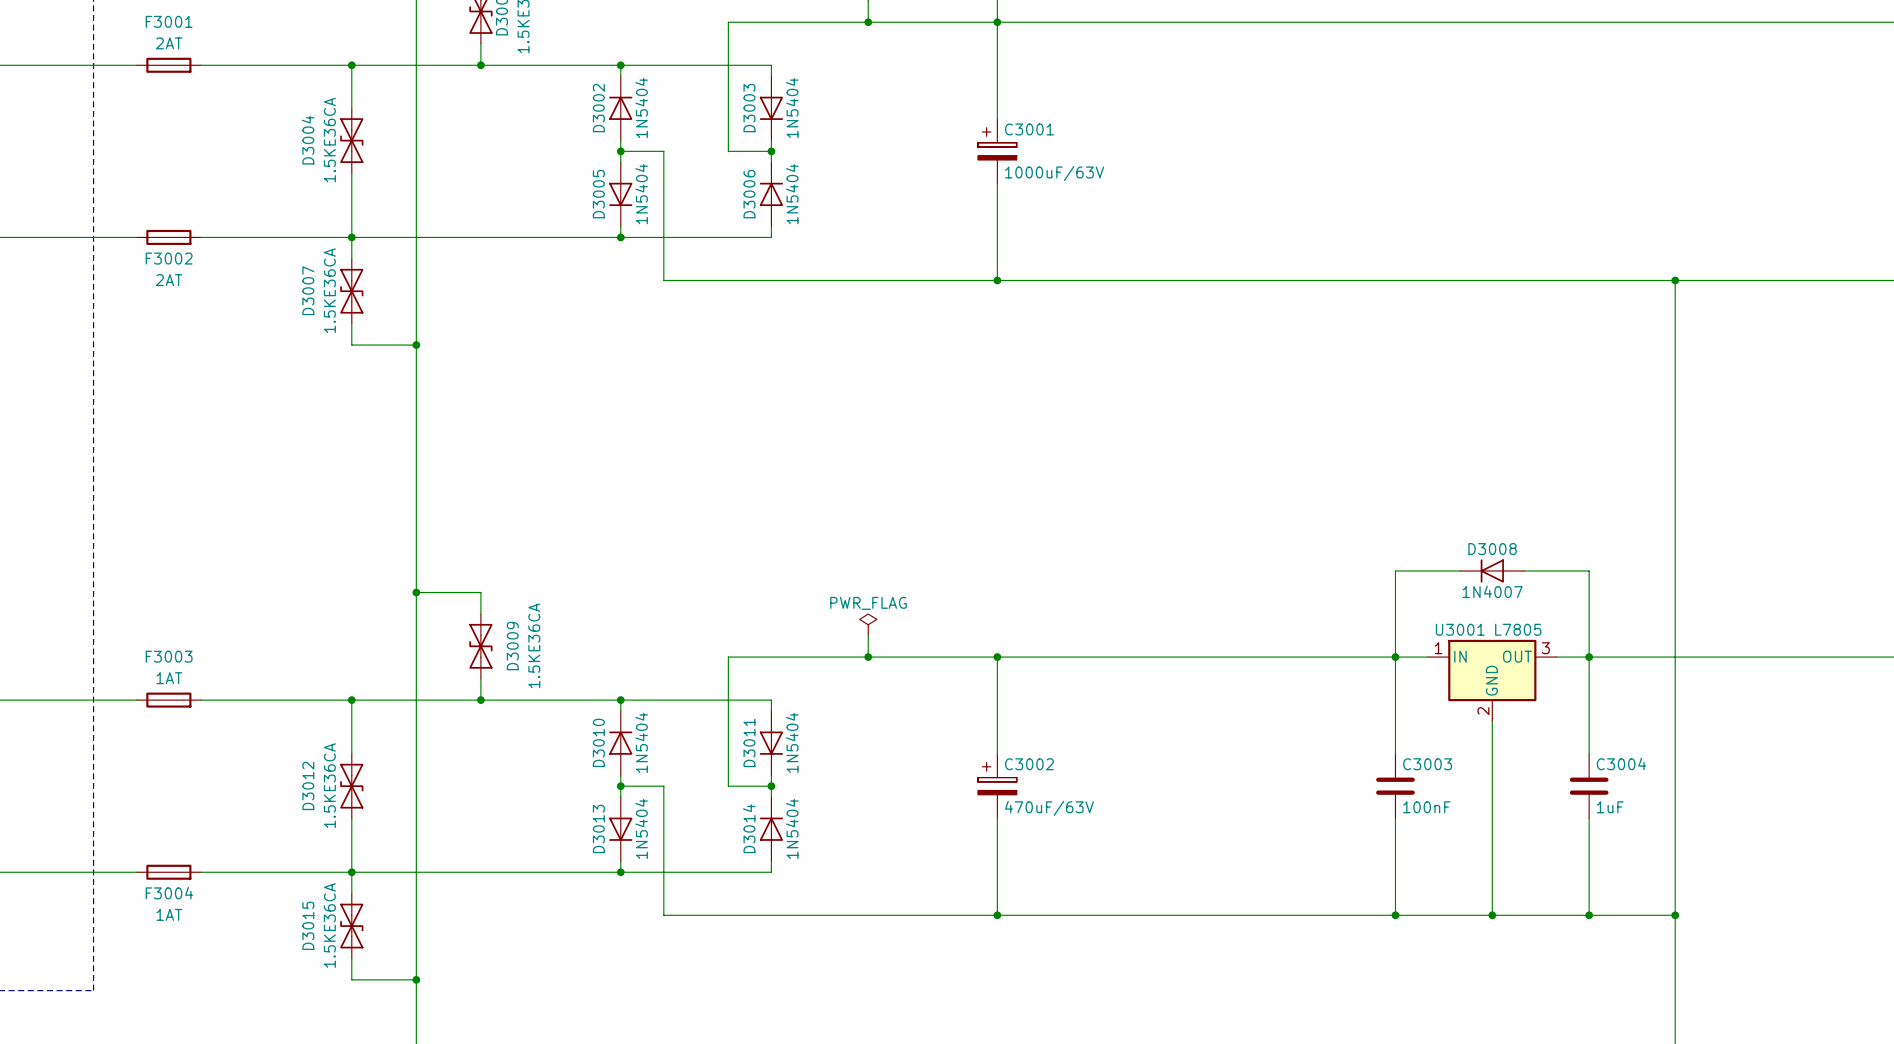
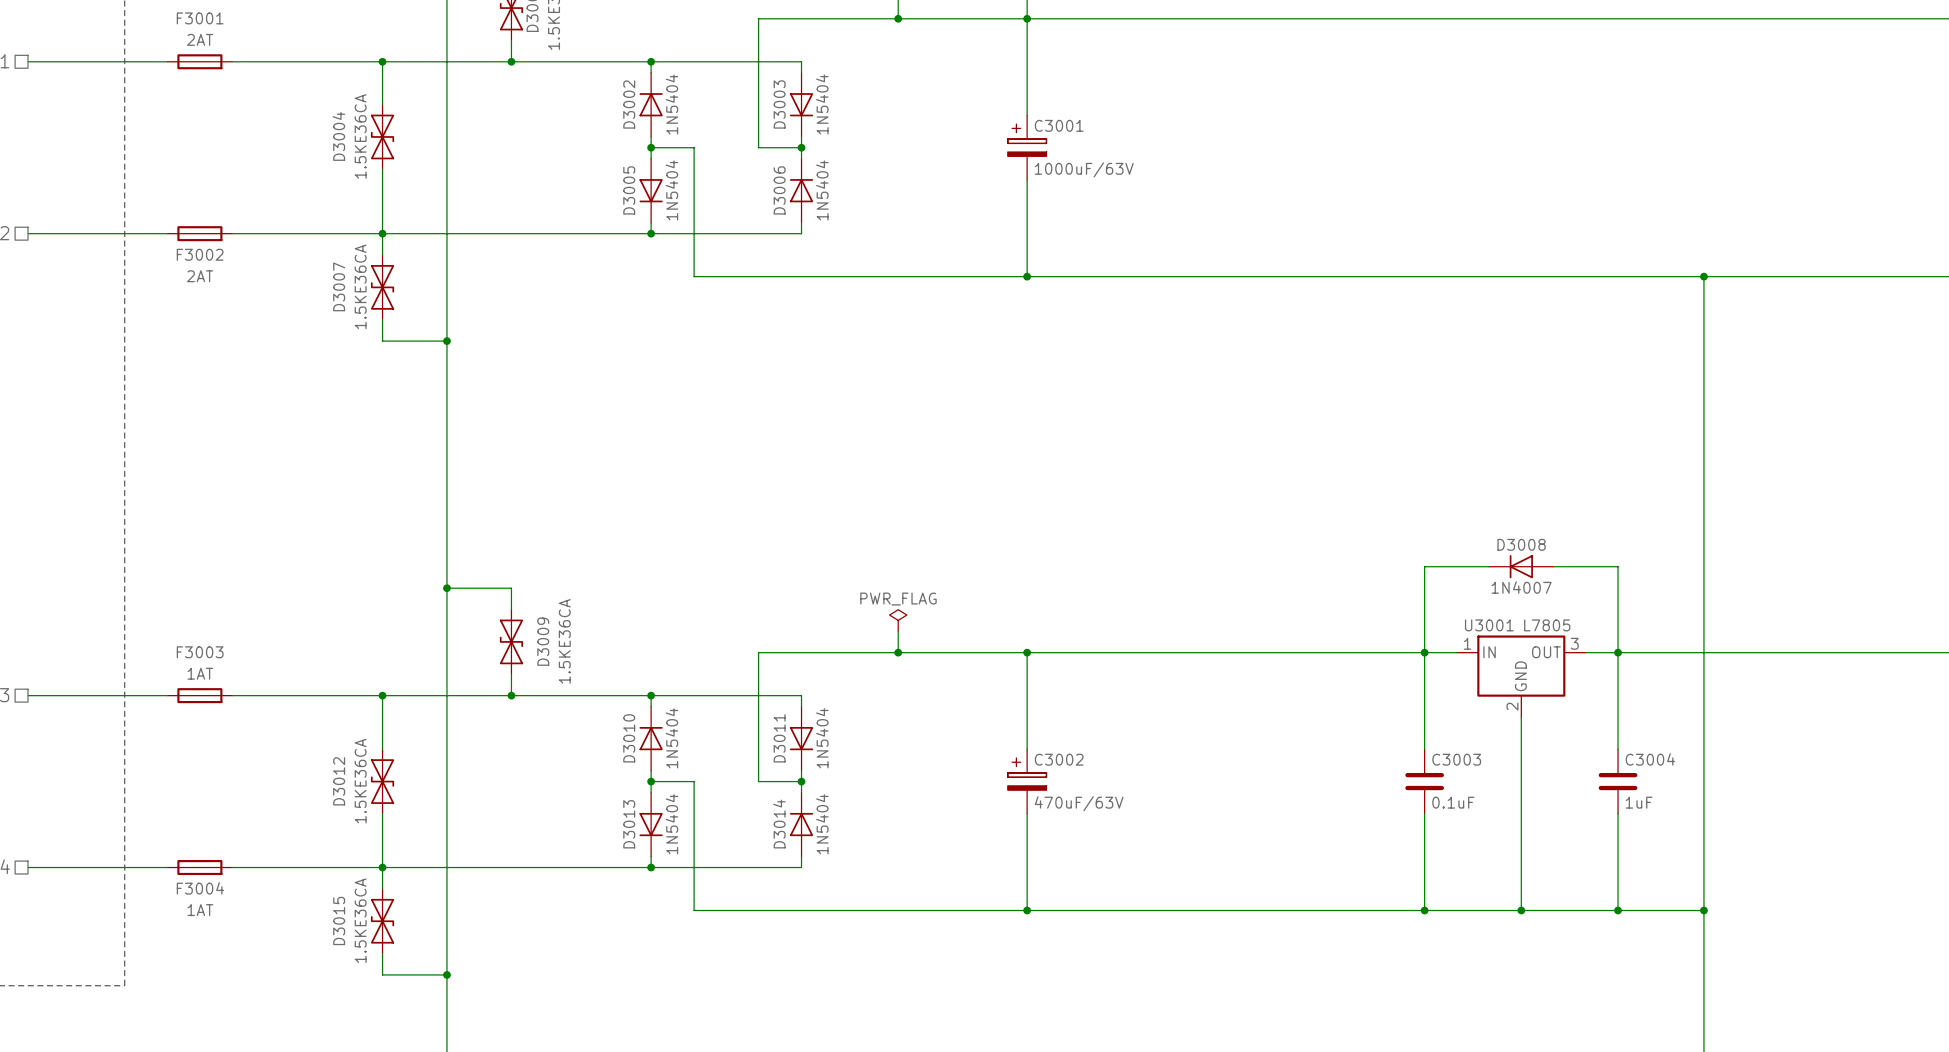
C3003 value: 100nF (1426, 807) -> 0.1uF (1453, 802)

